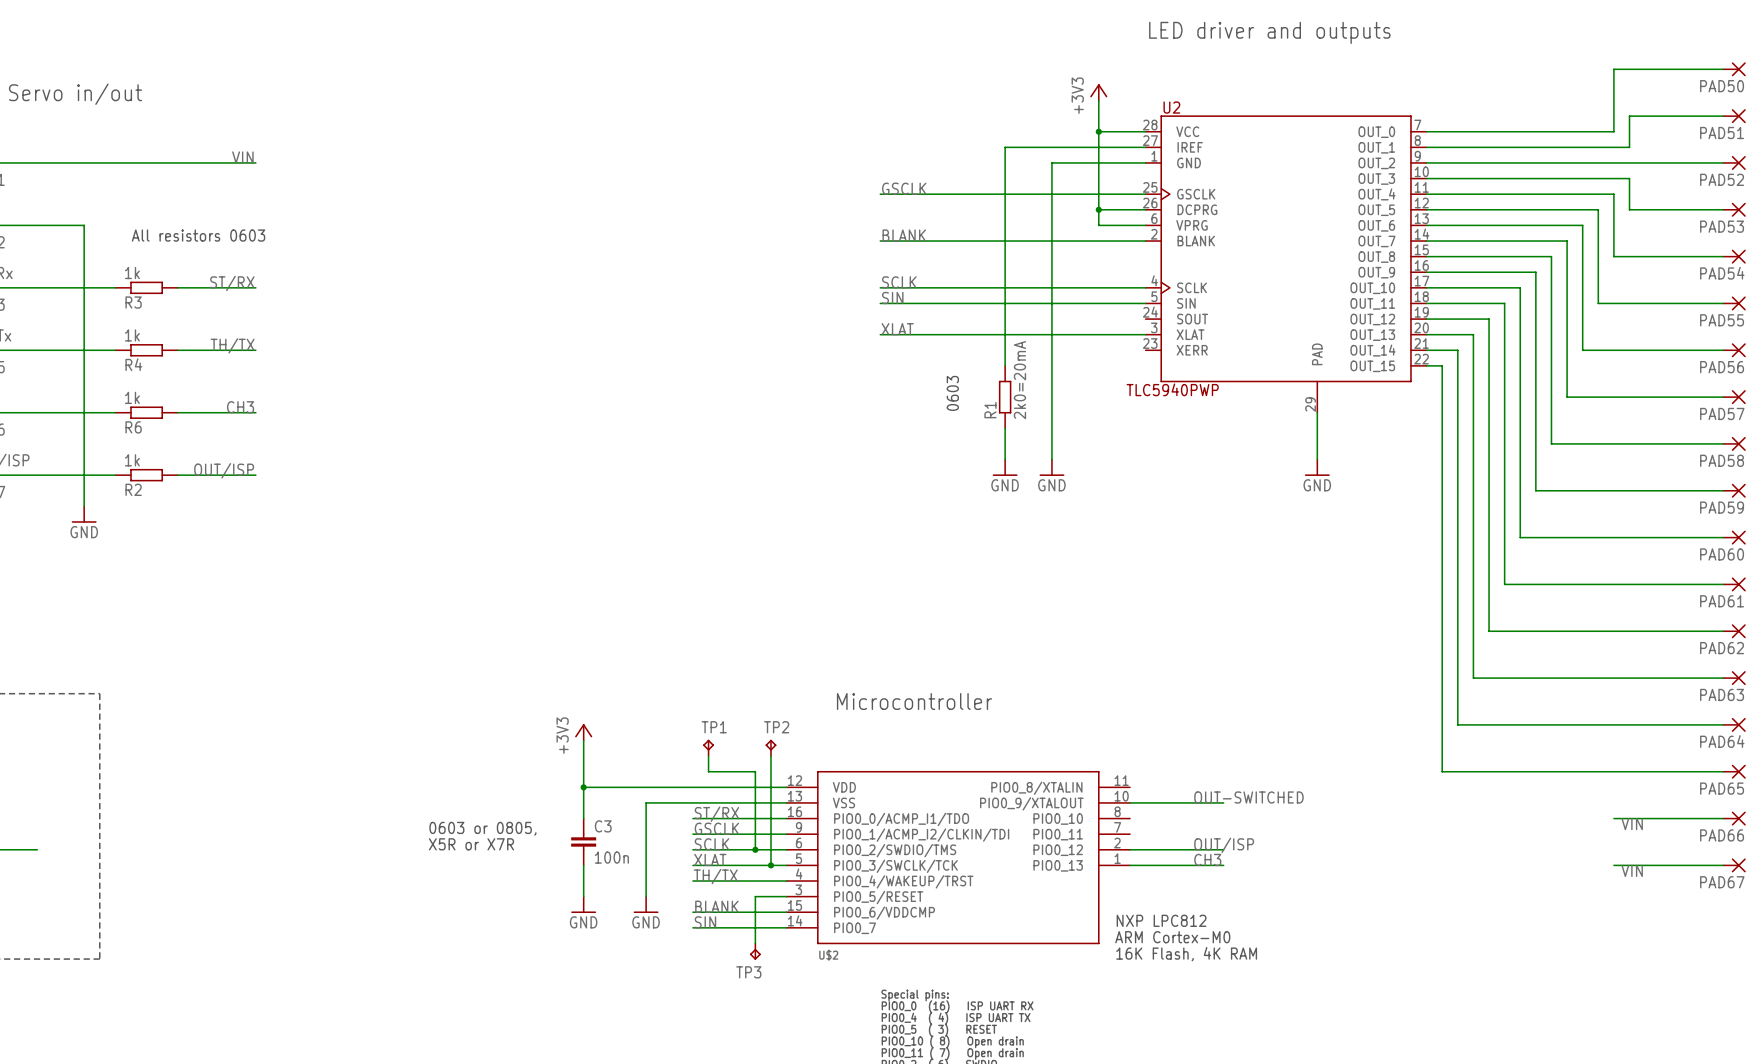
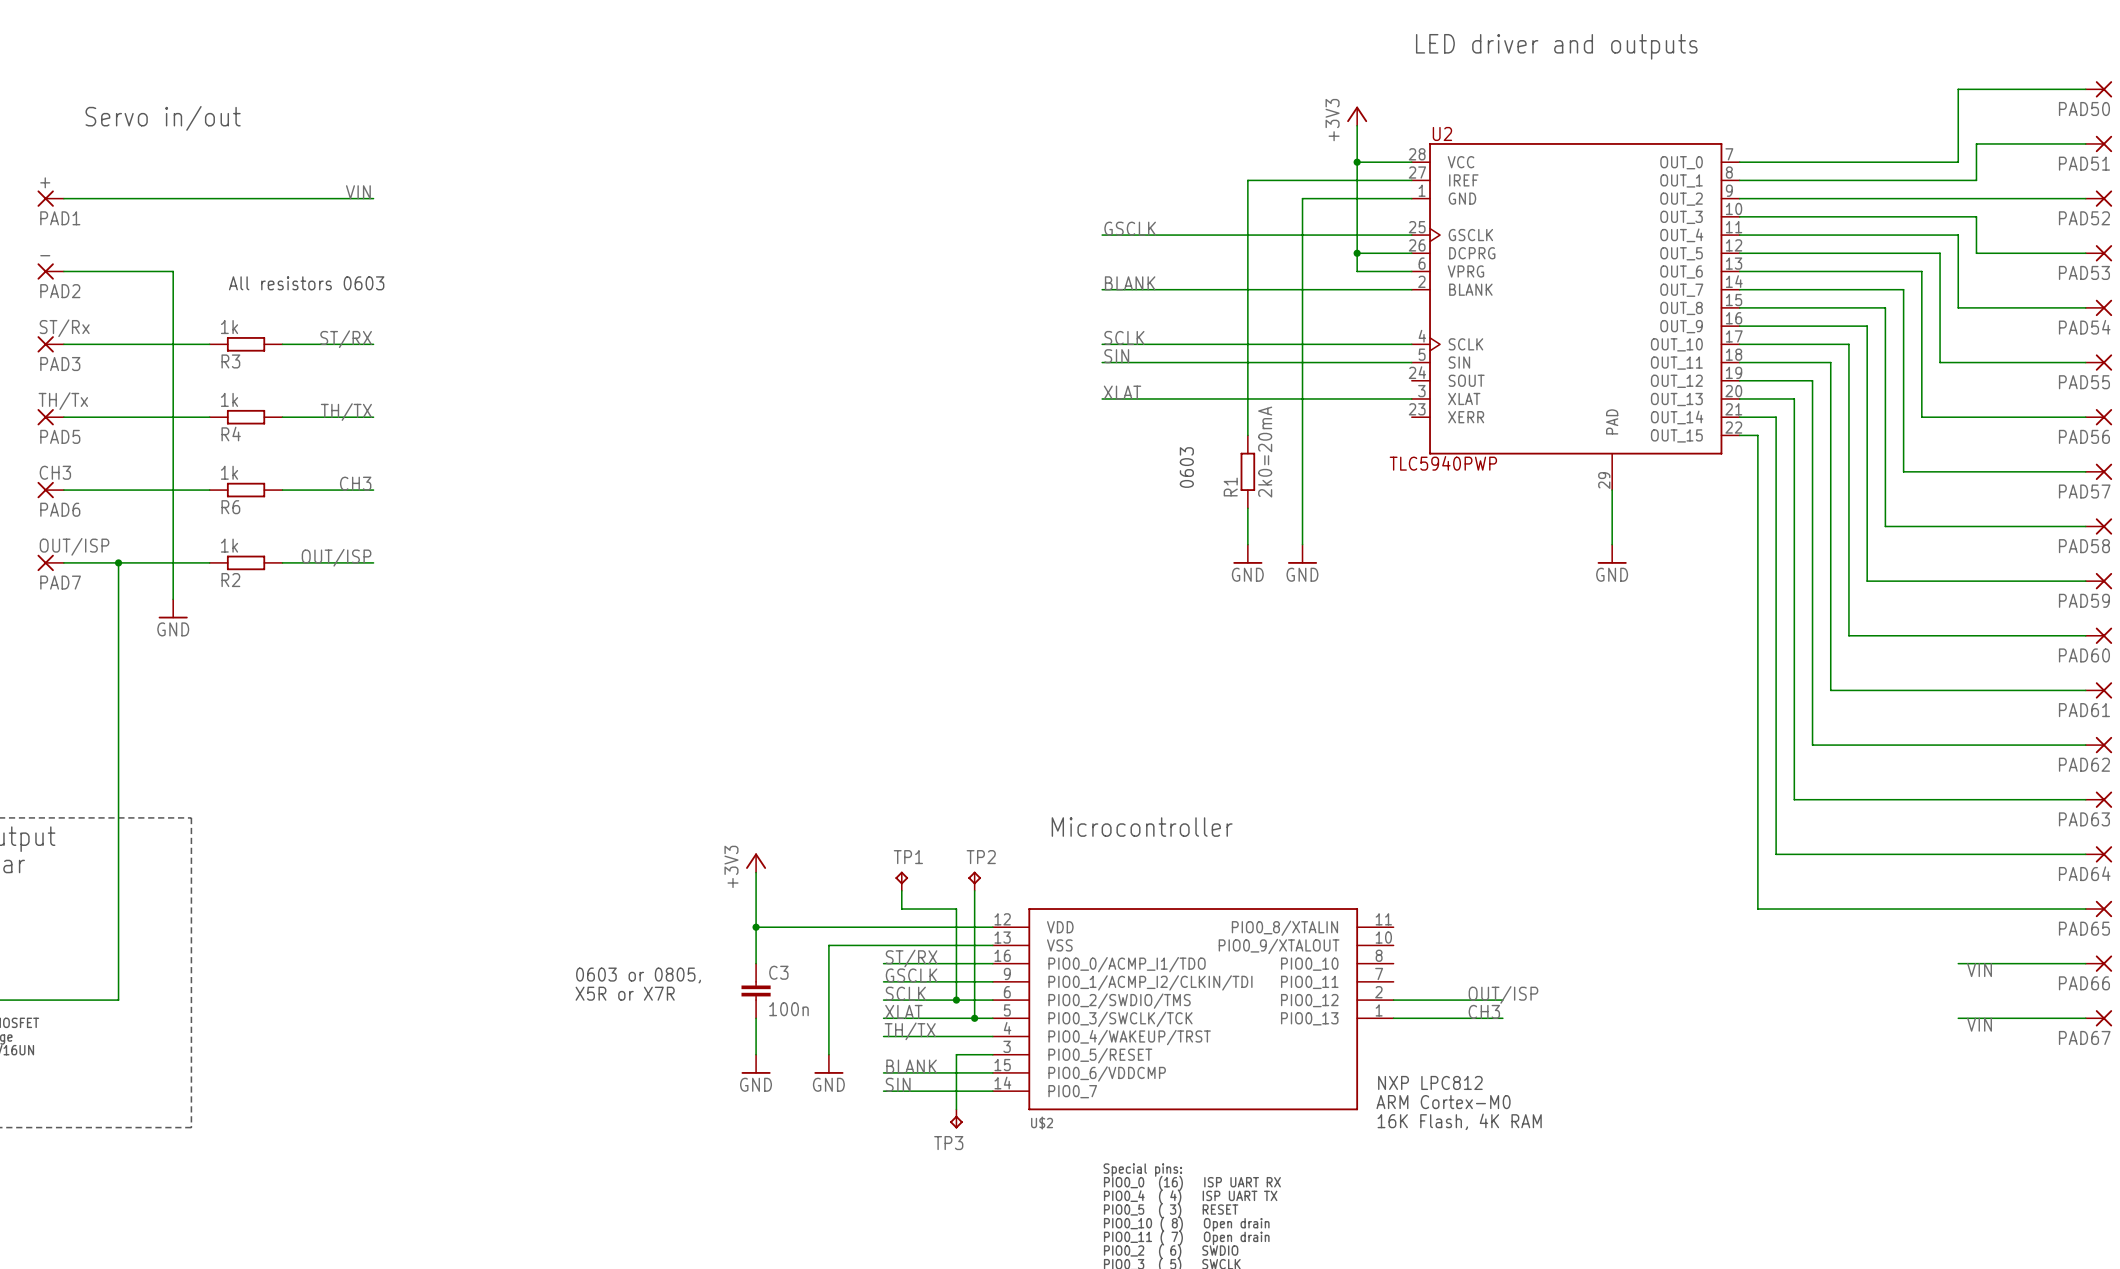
wire: none -> (118, 562) (118, 1000)
junction: none -> (118, 562)
label: OUT-SWITCHED (1248, 797) -> none
wire: (1130, 802) (1223, 802) -> none

